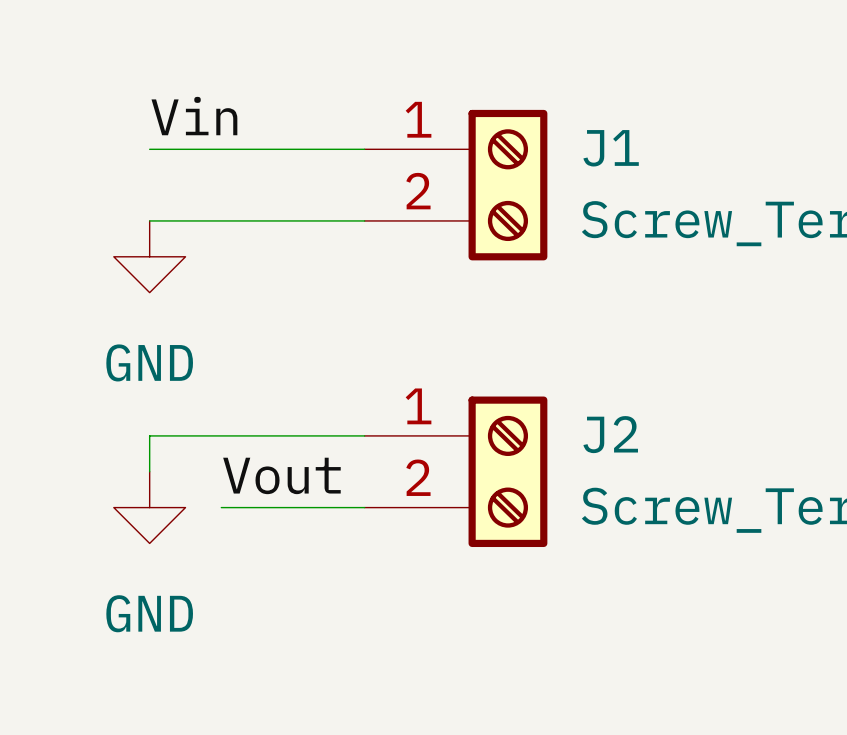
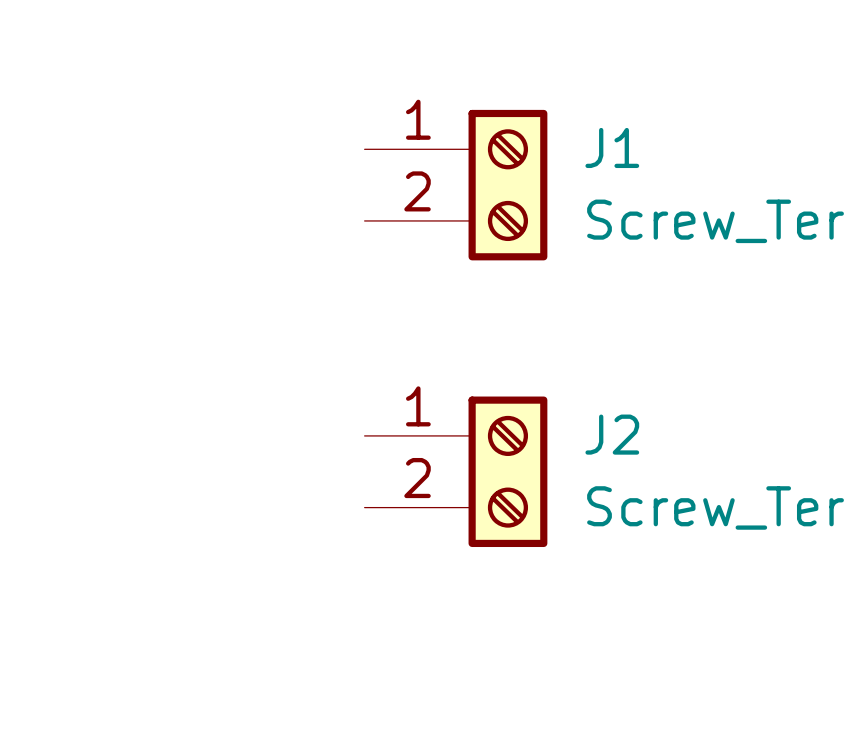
label: Vin (194, 116) -> none
wire: (149, 149) (364, 149) -> none
wire: (149, 220) (364, 220) -> none
power symbol: GND (149, 256) -> none
wire: (364, 435) (149, 435) (149, 471) -> none
label: Vout (281, 475) -> none
power symbol: GND (149, 507) -> none
wire: (221, 507) (364, 507) -> none

